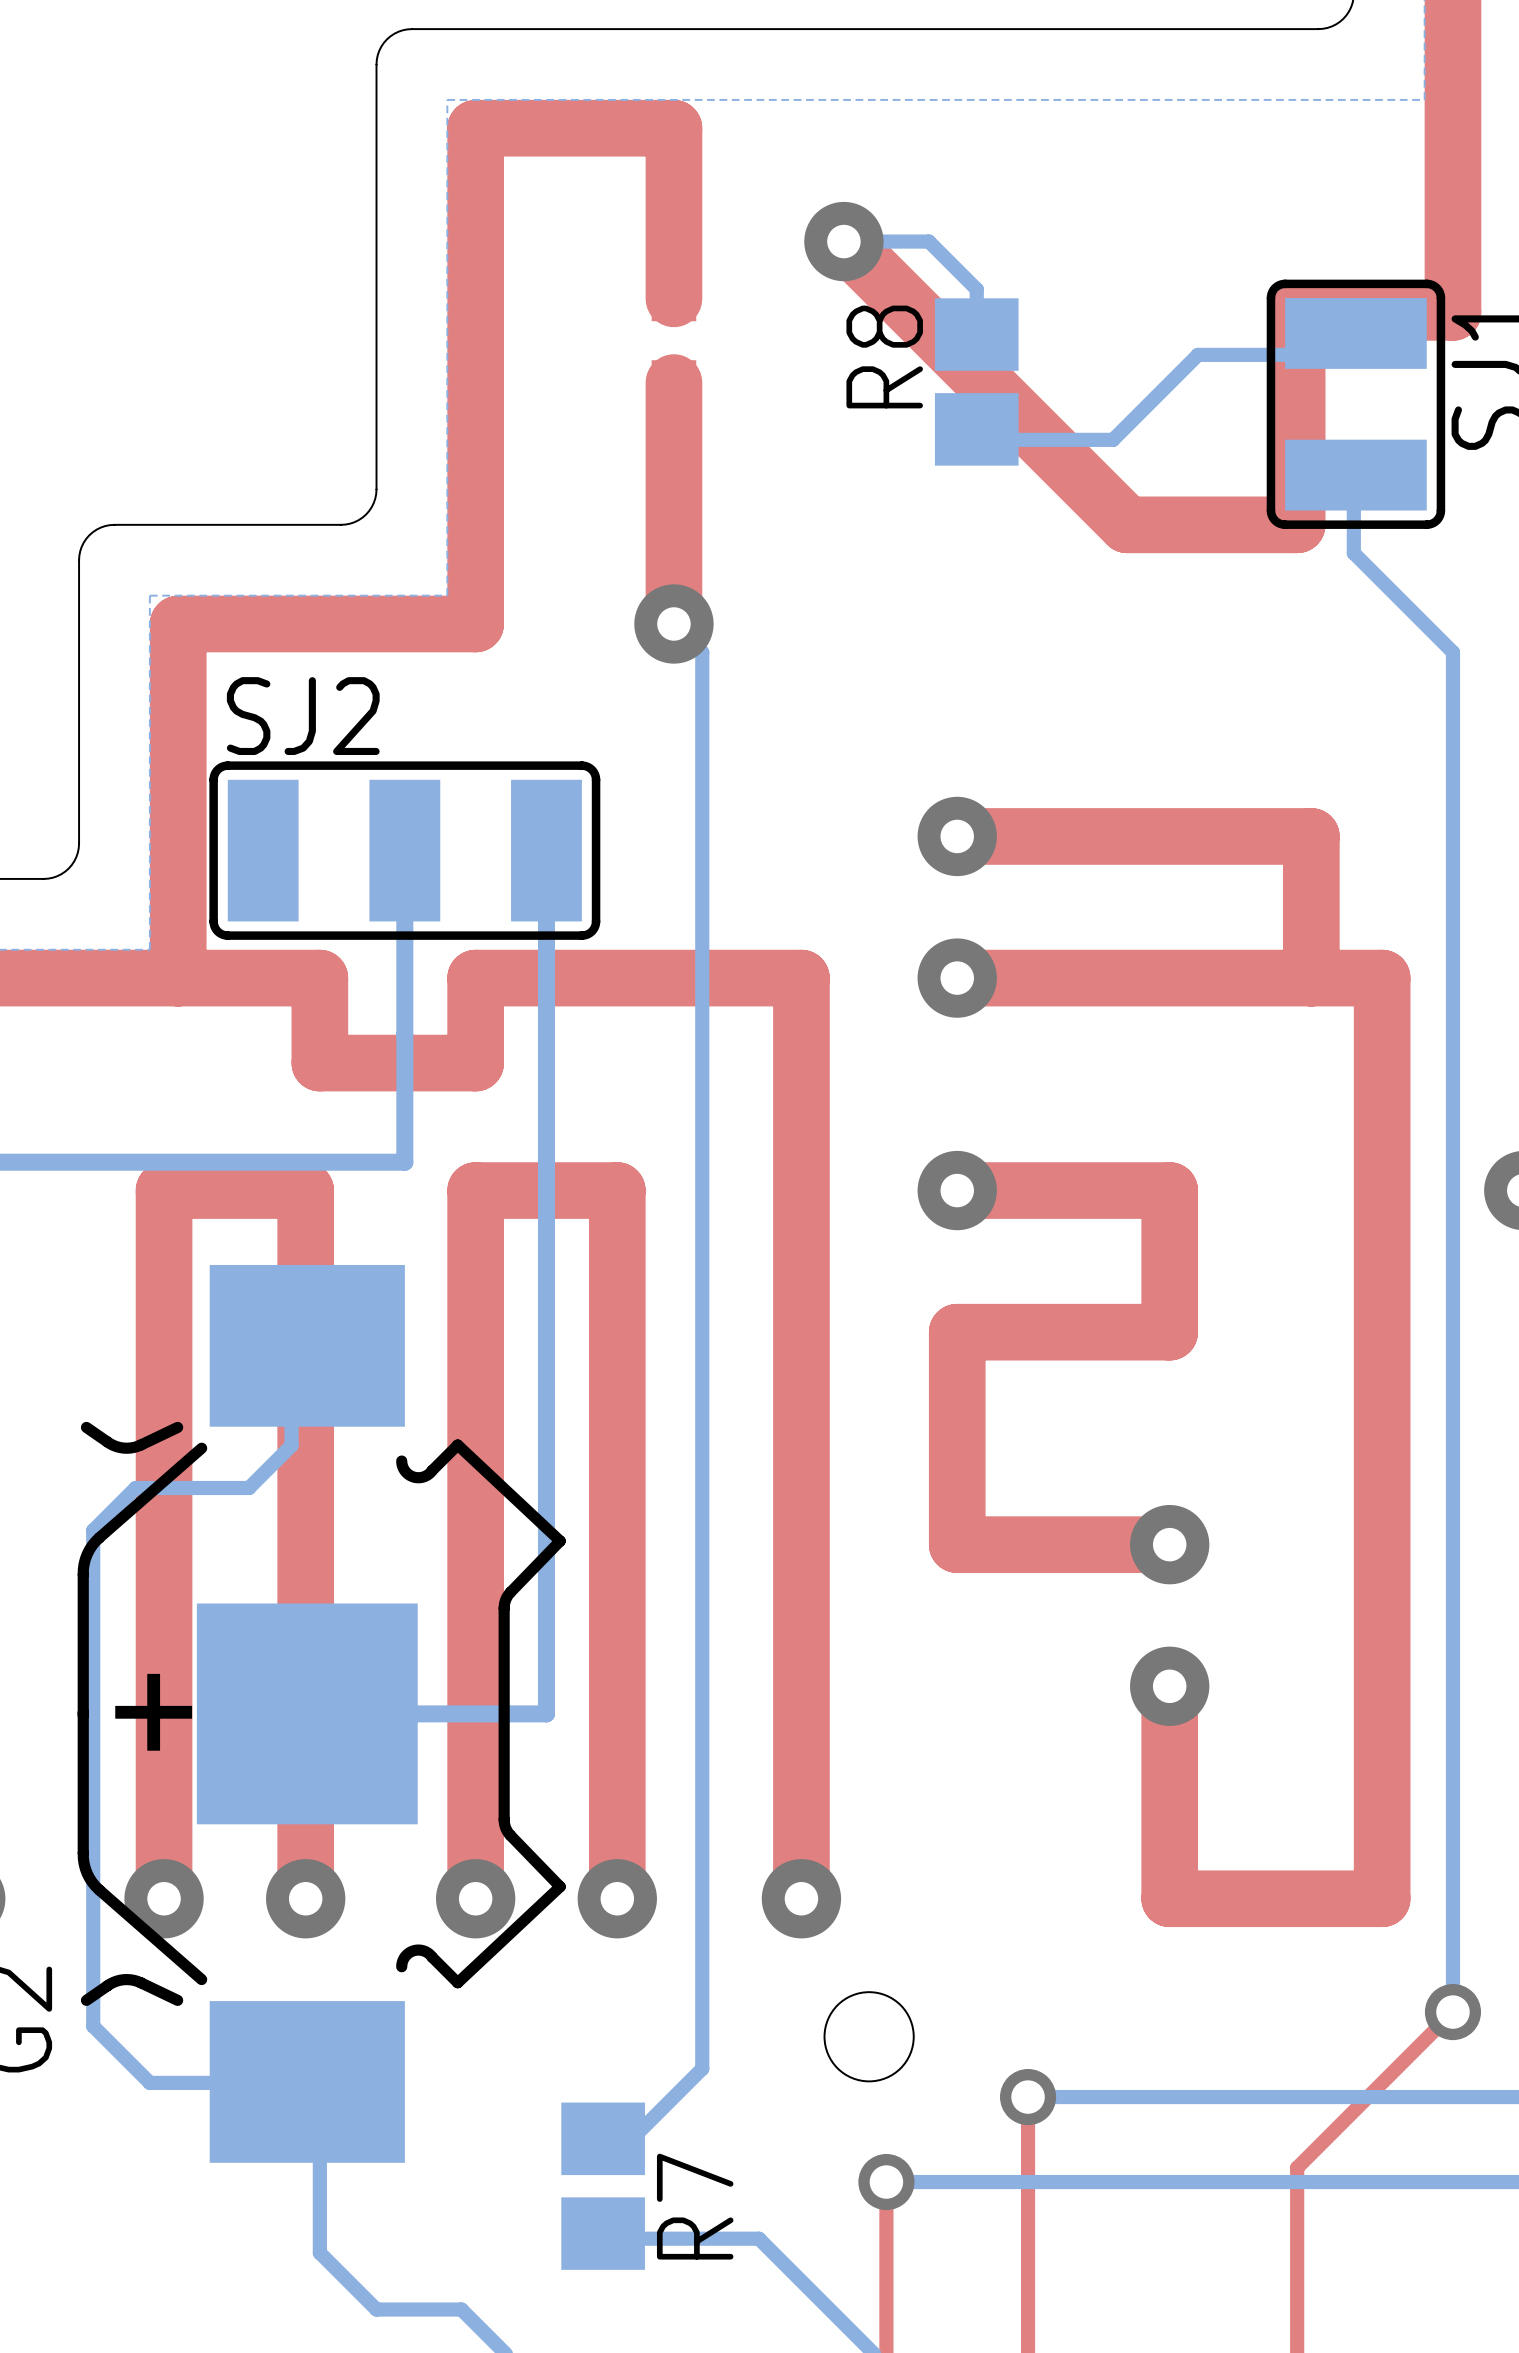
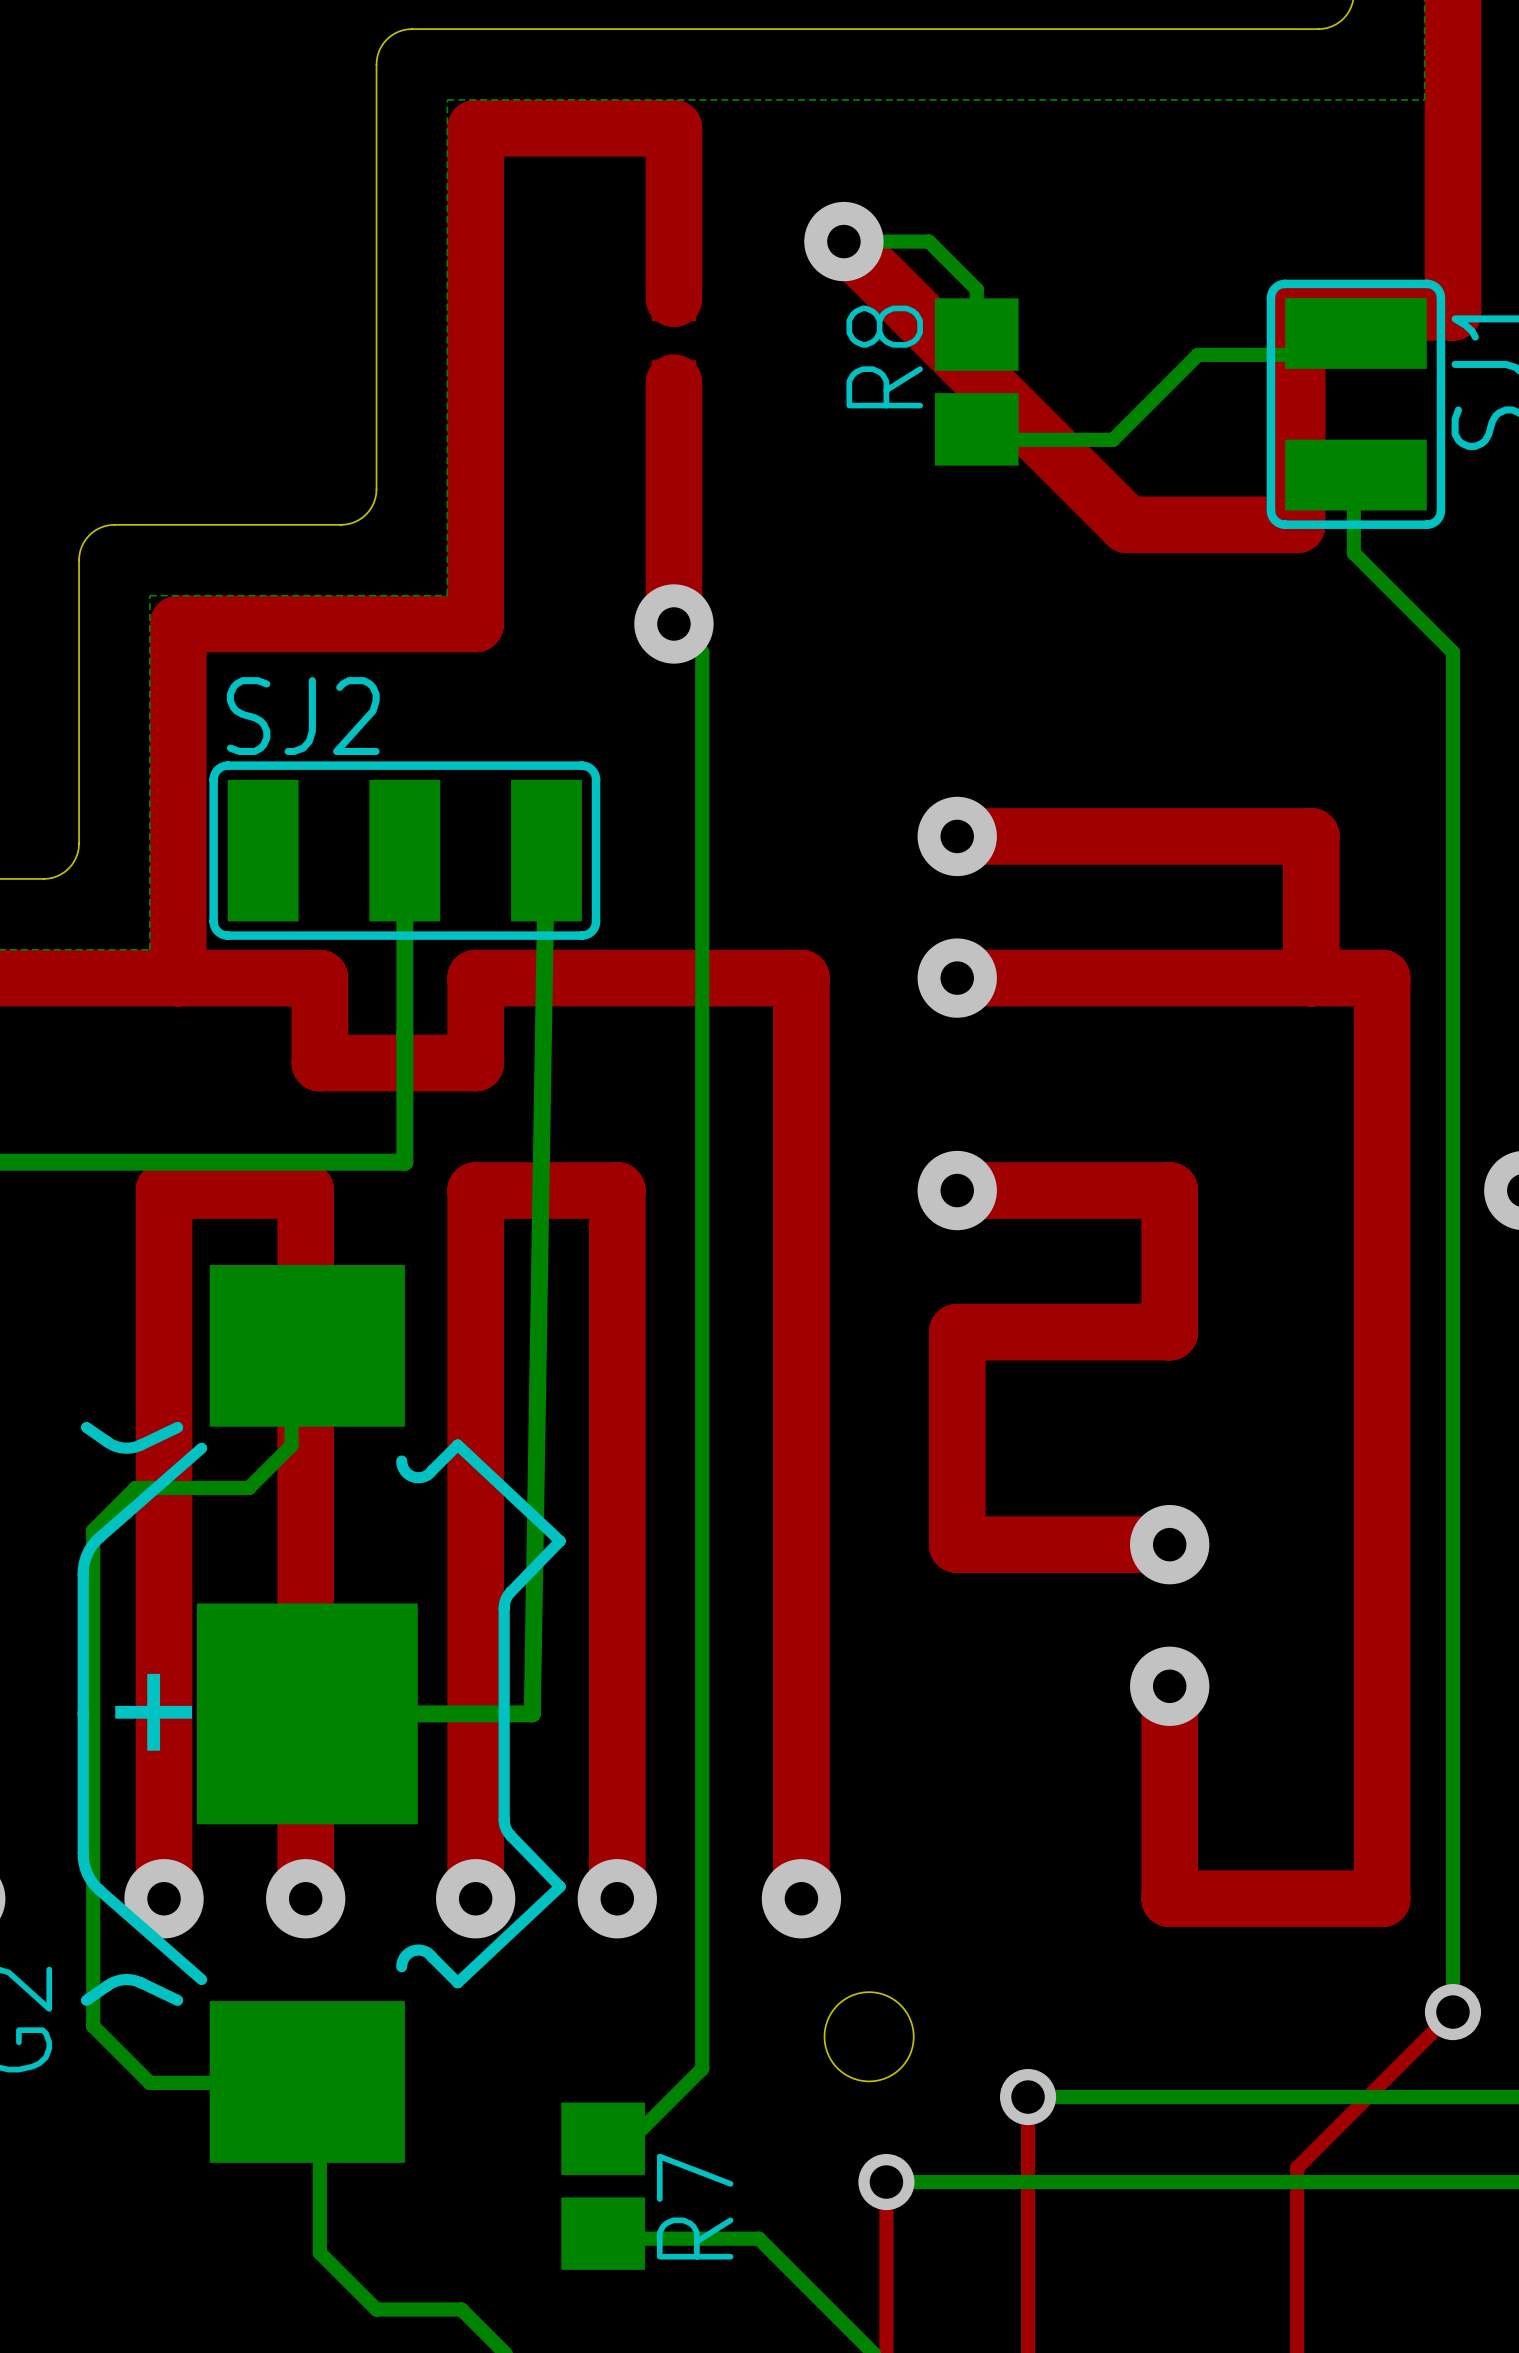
bottom track: (546, 850) (546, 1713) (532, 1713) -> (546, 850) (532, 1713)

